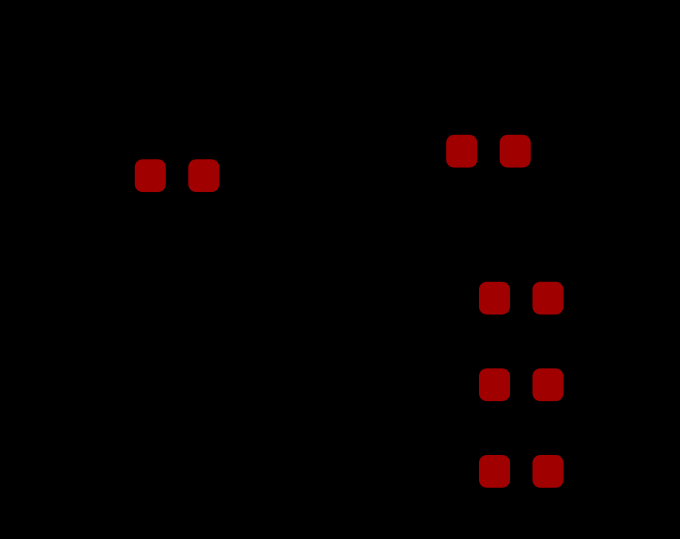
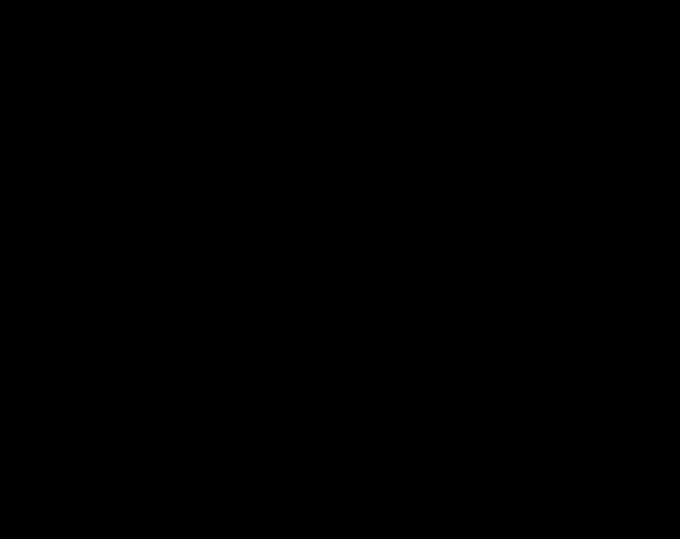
part: (488, 151) -> none
part: (177, 175) -> none
part: (521, 298) -> none
part: (521, 384) -> none
part: (521, 471) -> none

